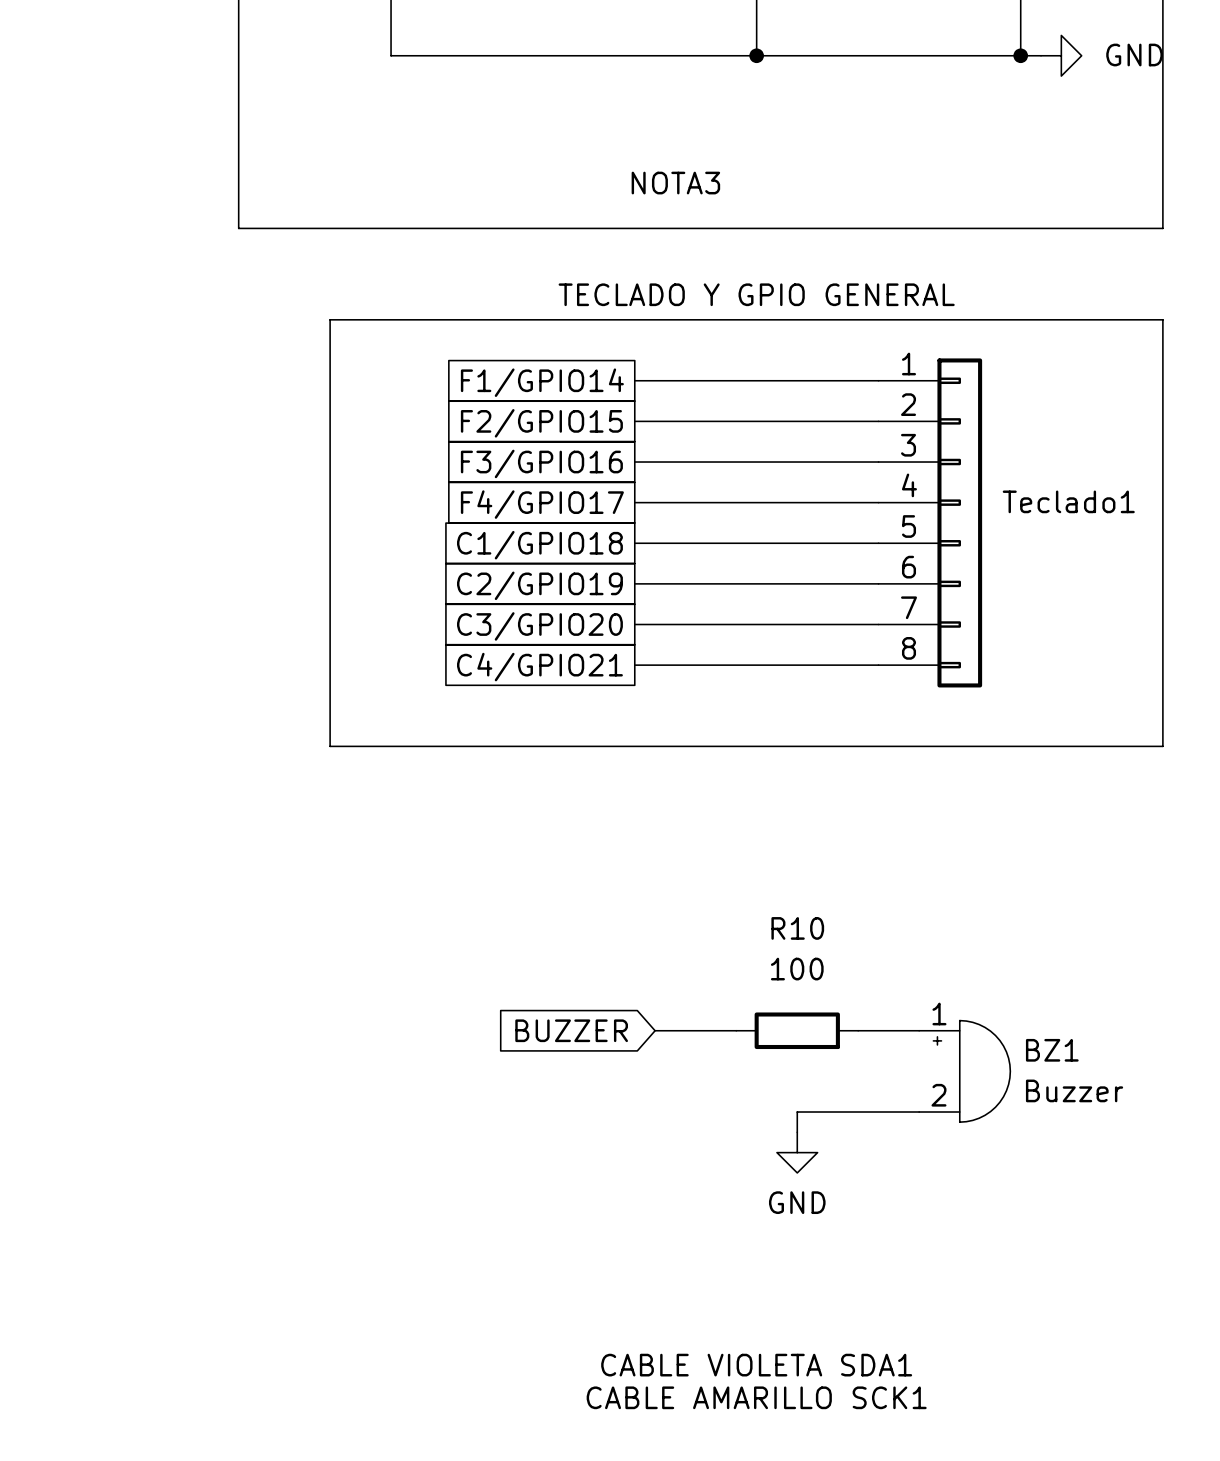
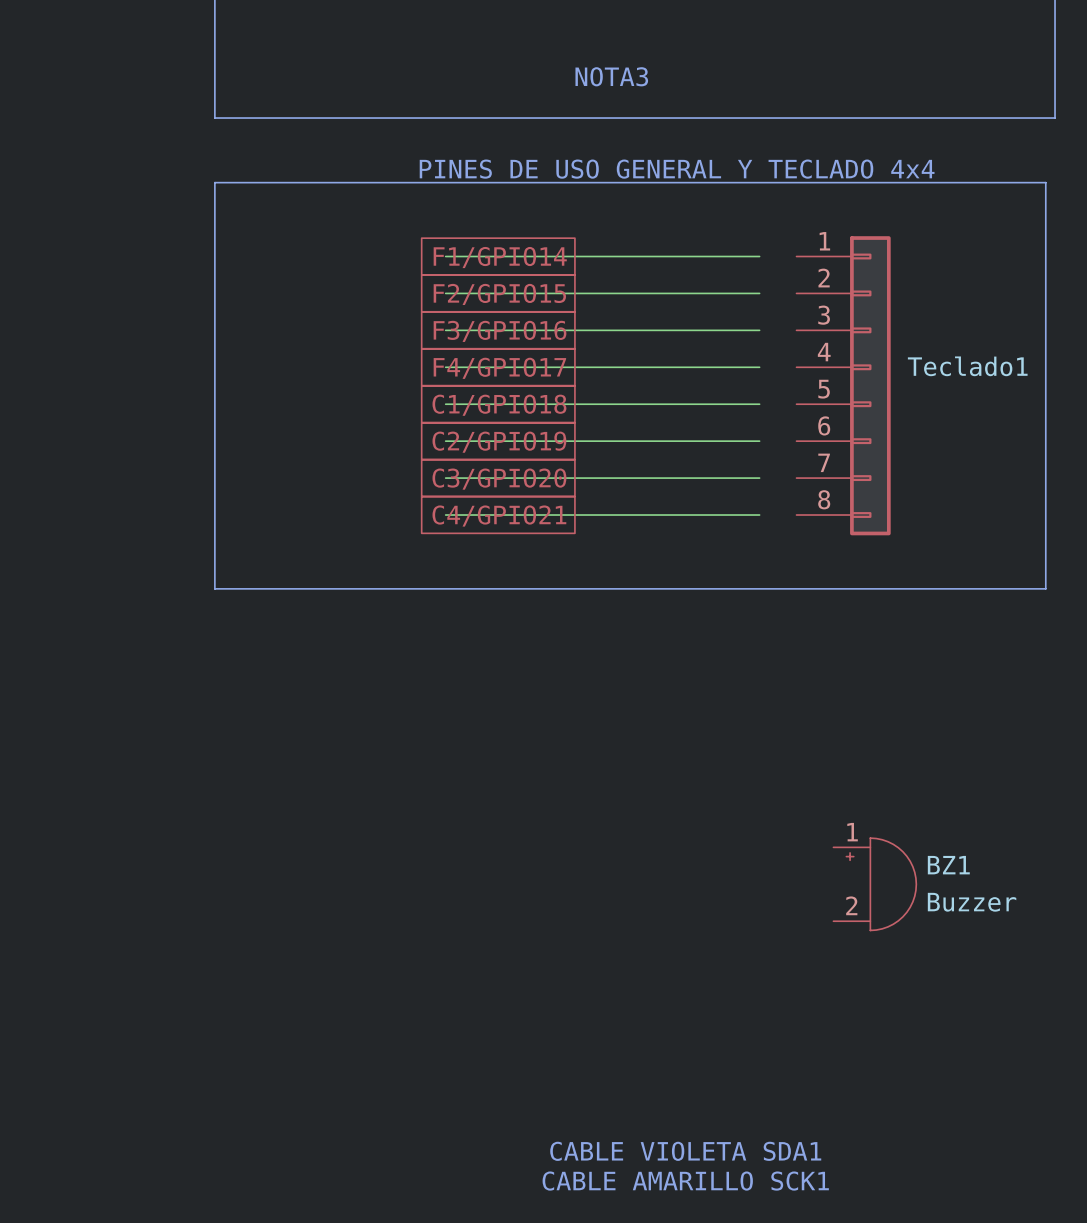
text: TECLADO Y GPIO GENERAL (756, 294) -> PINES DE USO GENERAL Y TECLADO 4x4 (677, 169)
wire: none -> (445, 256) (574, 256)
wire: (837, 380) (878, 380) -> none
wire: none -> (445, 293) (574, 293)
wire: (837, 421) (878, 421) -> none
wire: none -> (445, 330) (574, 330)
wire: (837, 462) (878, 462) -> none
wire: none -> (445, 367) (574, 367)
wire: (837, 502) (878, 502) -> none
wire: none -> (445, 404) (574, 404)
wire: (837, 543) (878, 543) -> none
wire: none -> (445, 441) (574, 441)
wire: (837, 583) (878, 583) -> none
wire: none -> (445, 478) (574, 478)
wire: (837, 624) (878, 624) -> none
wire: none -> (445, 515) (574, 515)
wire: (837, 665) (878, 665) -> none
line: (330, 746) (330, 319) (1162, 319) (1162, 746) (1152, 746) -> (297, 588) (214, 588) (214, 182) (1045, 182) (1045, 588)
global label: BUZZER (571, 1030) -> none
wire: (655, 1030) (736, 1030) -> none
R10: 100 (797, 1030) -> none
wire: (858, 1030) (919, 1030) -> none
wire: (919, 1112) (797, 1112) (797, 1132) -> none
power symbol: GND (797, 1152) -> none

